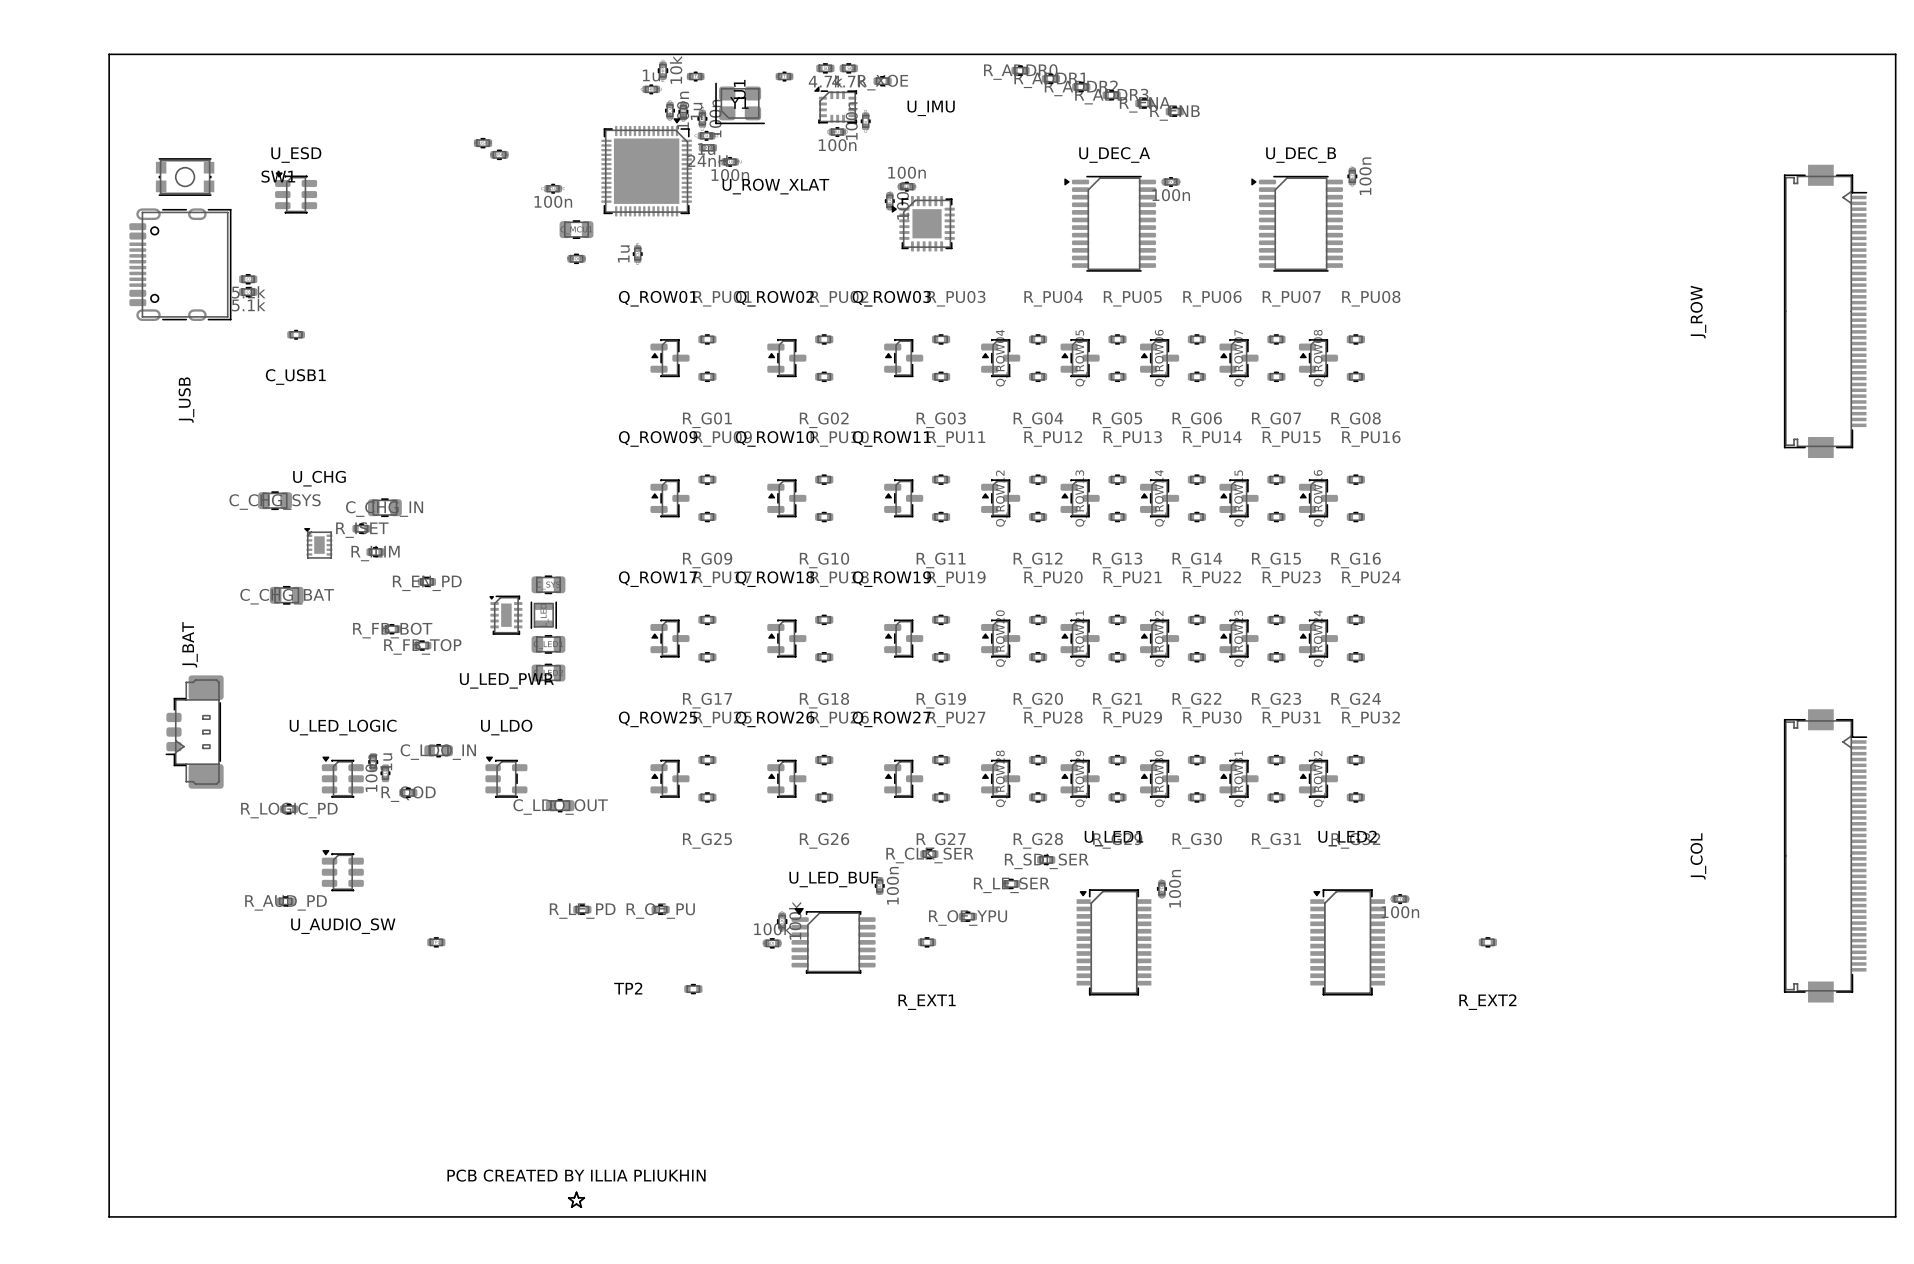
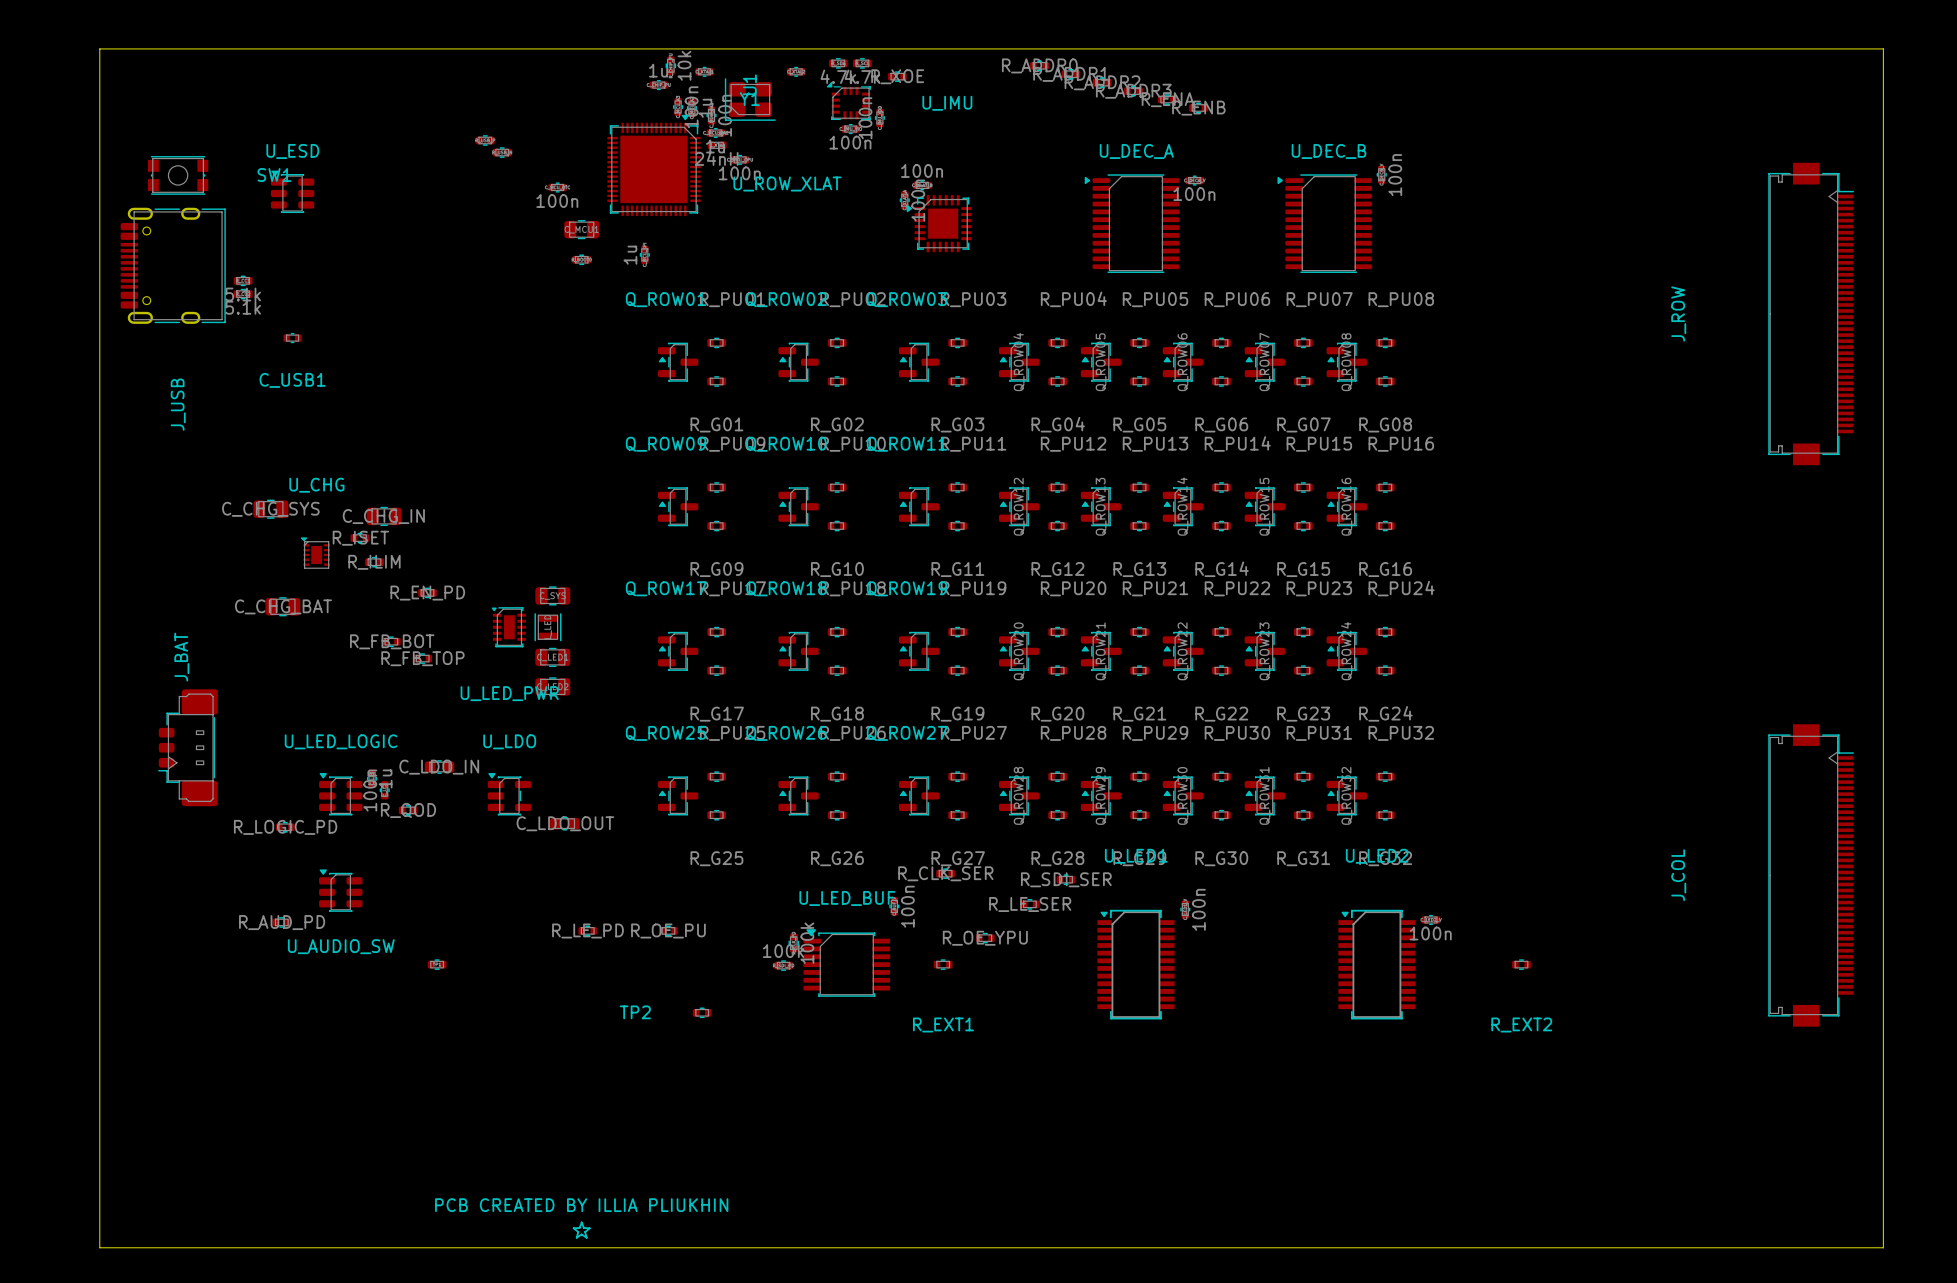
board edge: (1838, 54) (1895, 54) (1895, 1216) (1838, 1216) -> (1883, 48) (1883, 1247)
J_ROW position: (1825, 311) -> (1811, 314)
J_COL position: (1825, 855) -> (1811, 875)

